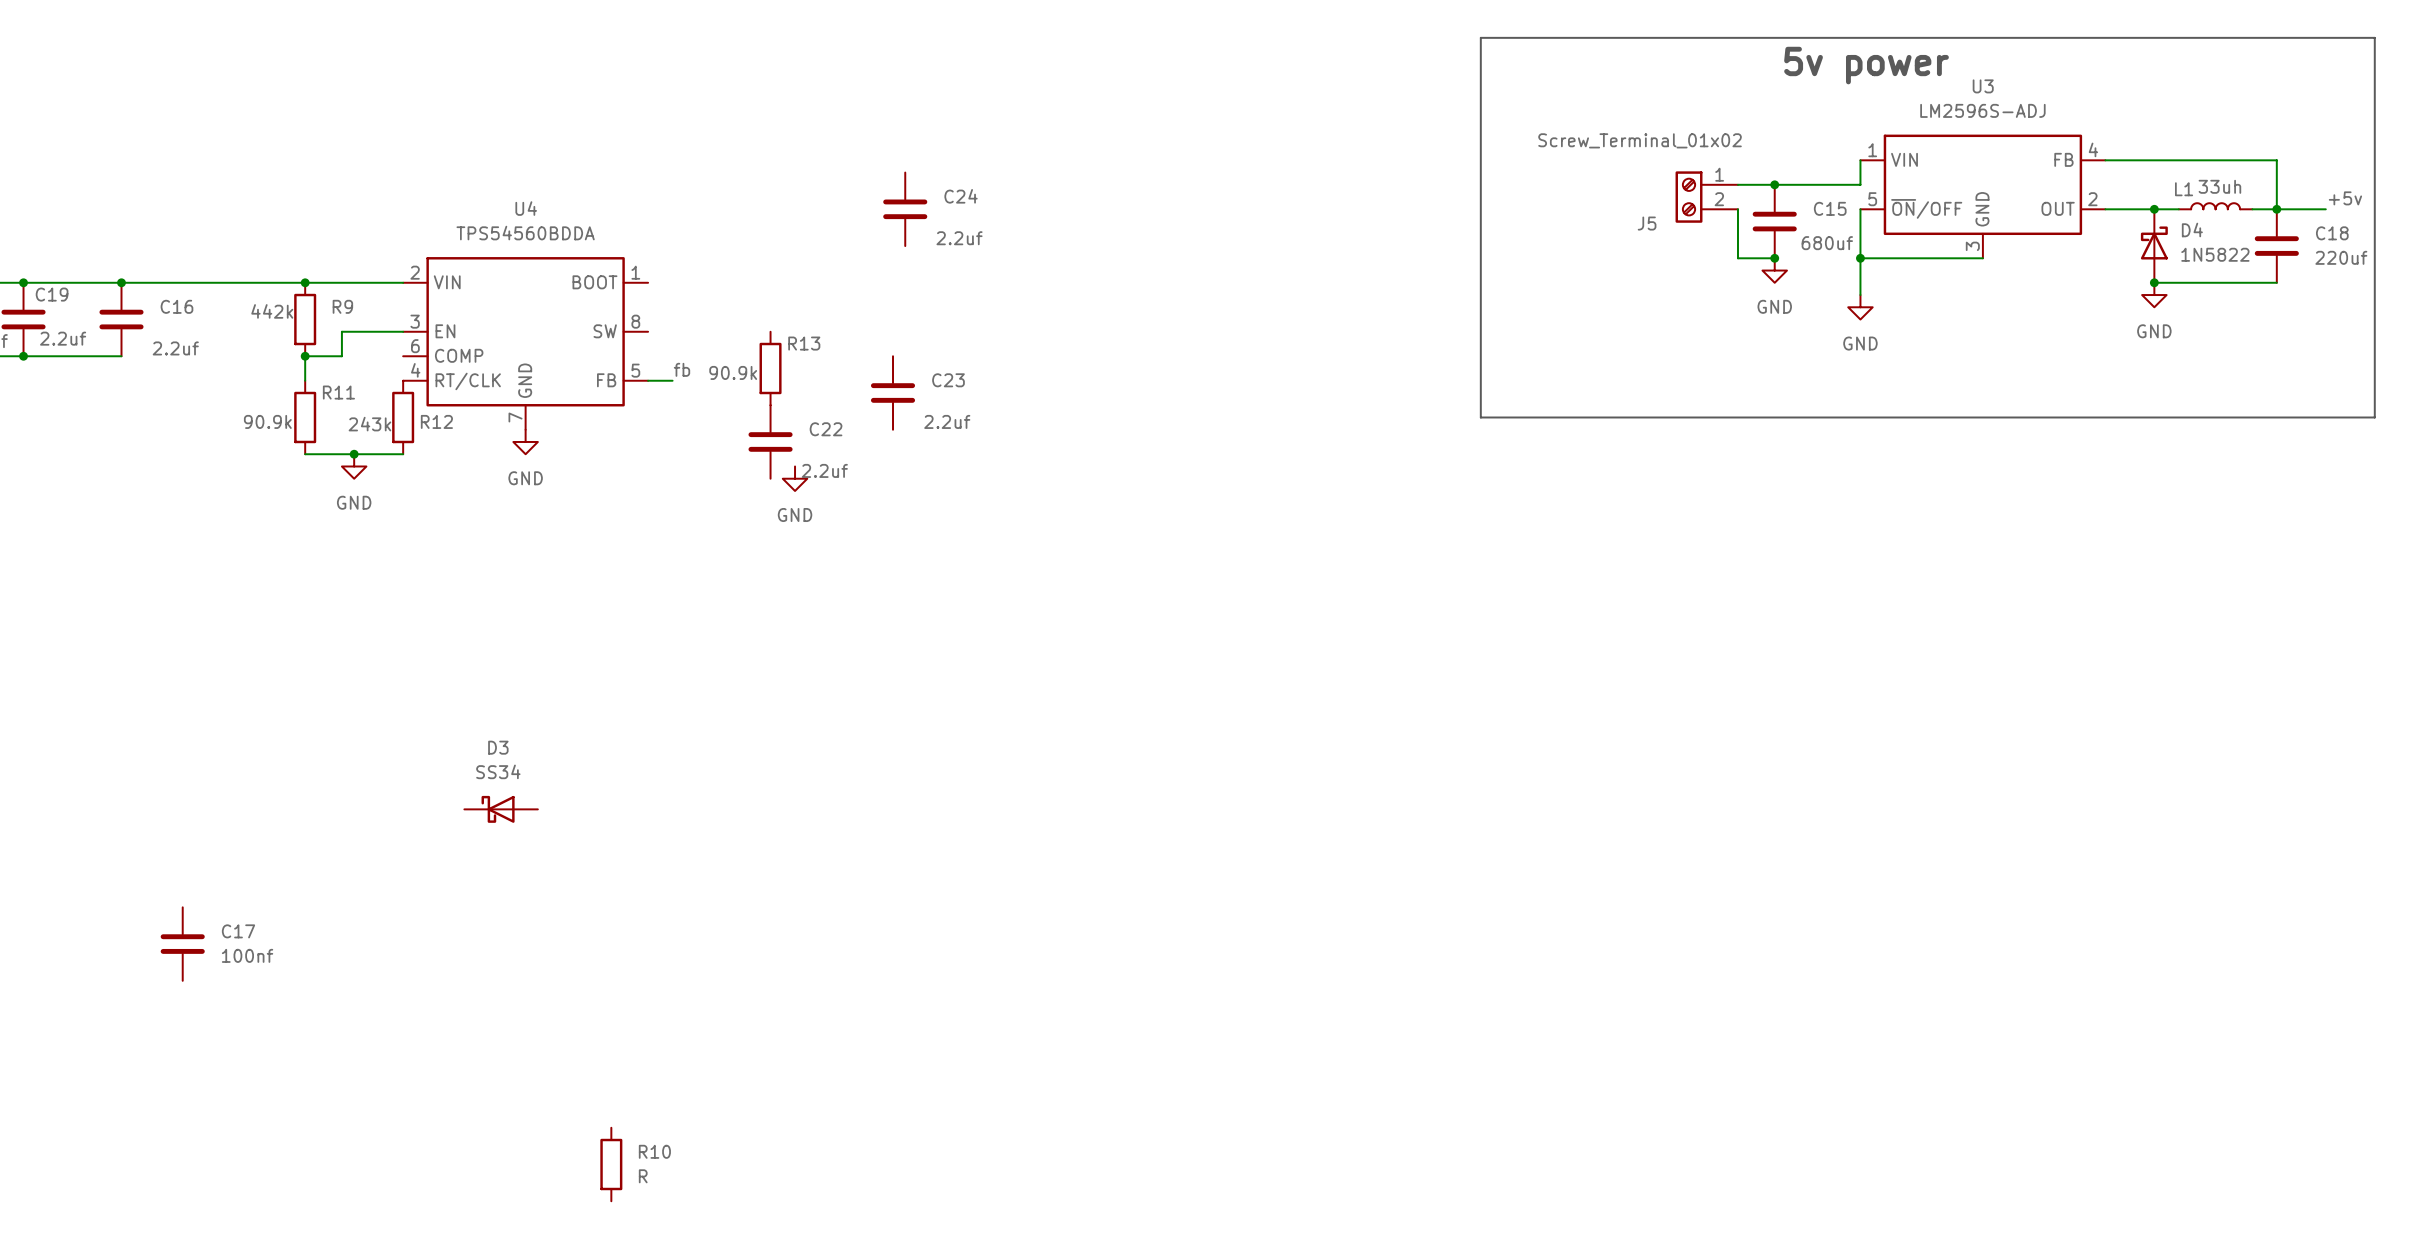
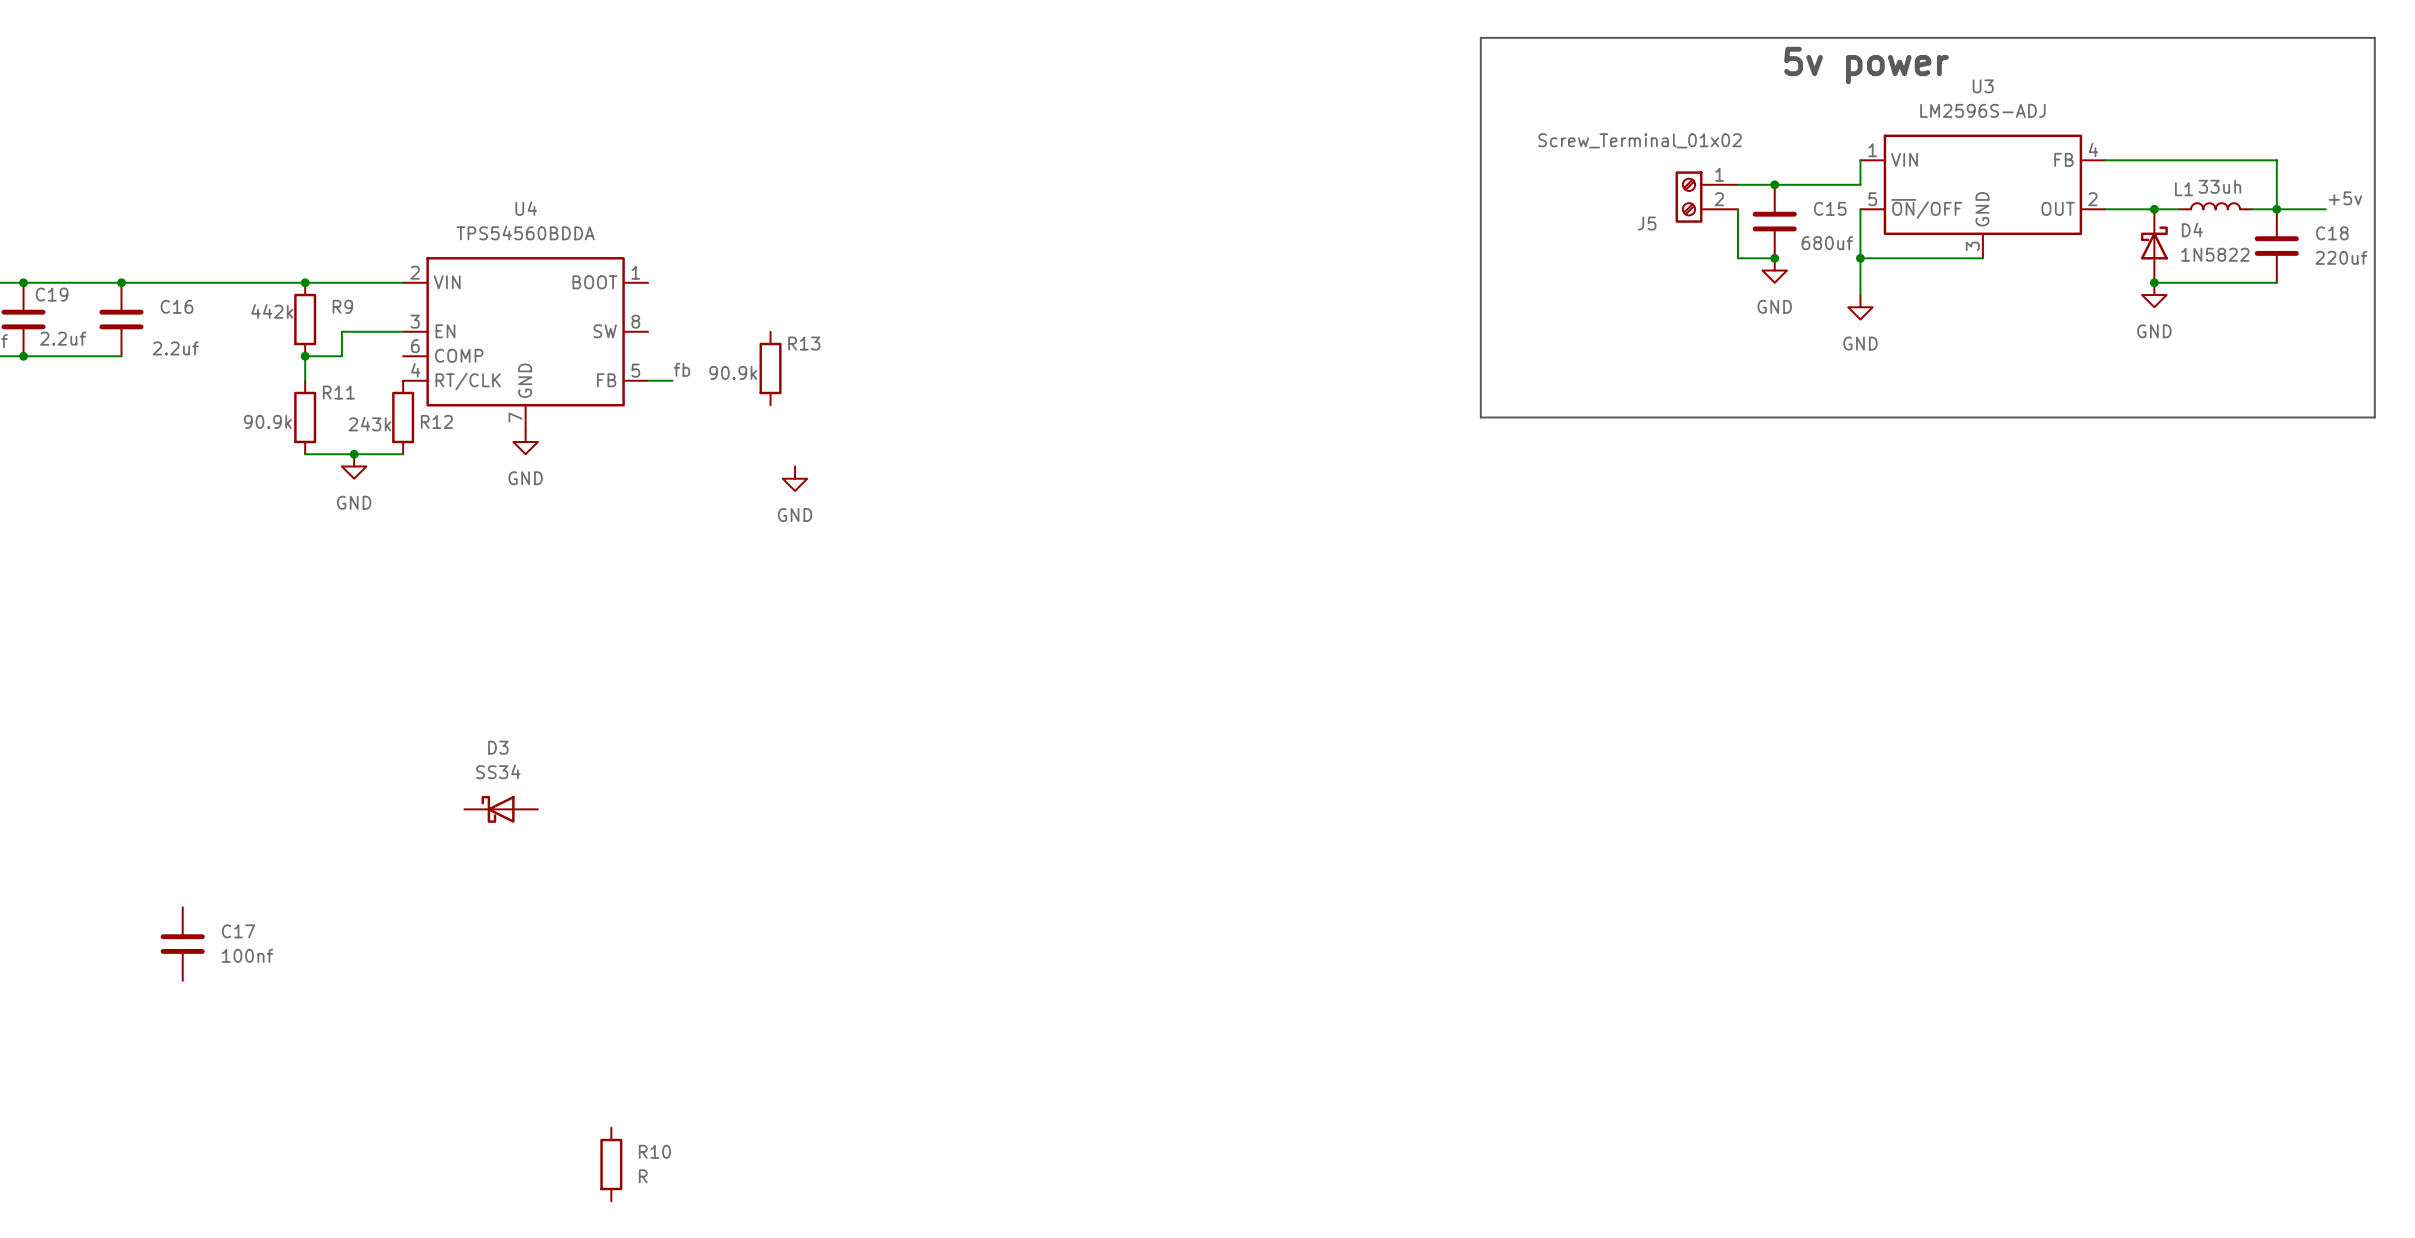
C24: 2.2uf (905, 209) -> none
C23: 2.2uf (893, 393) -> none
C22: 2.2uf (770, 441) -> none

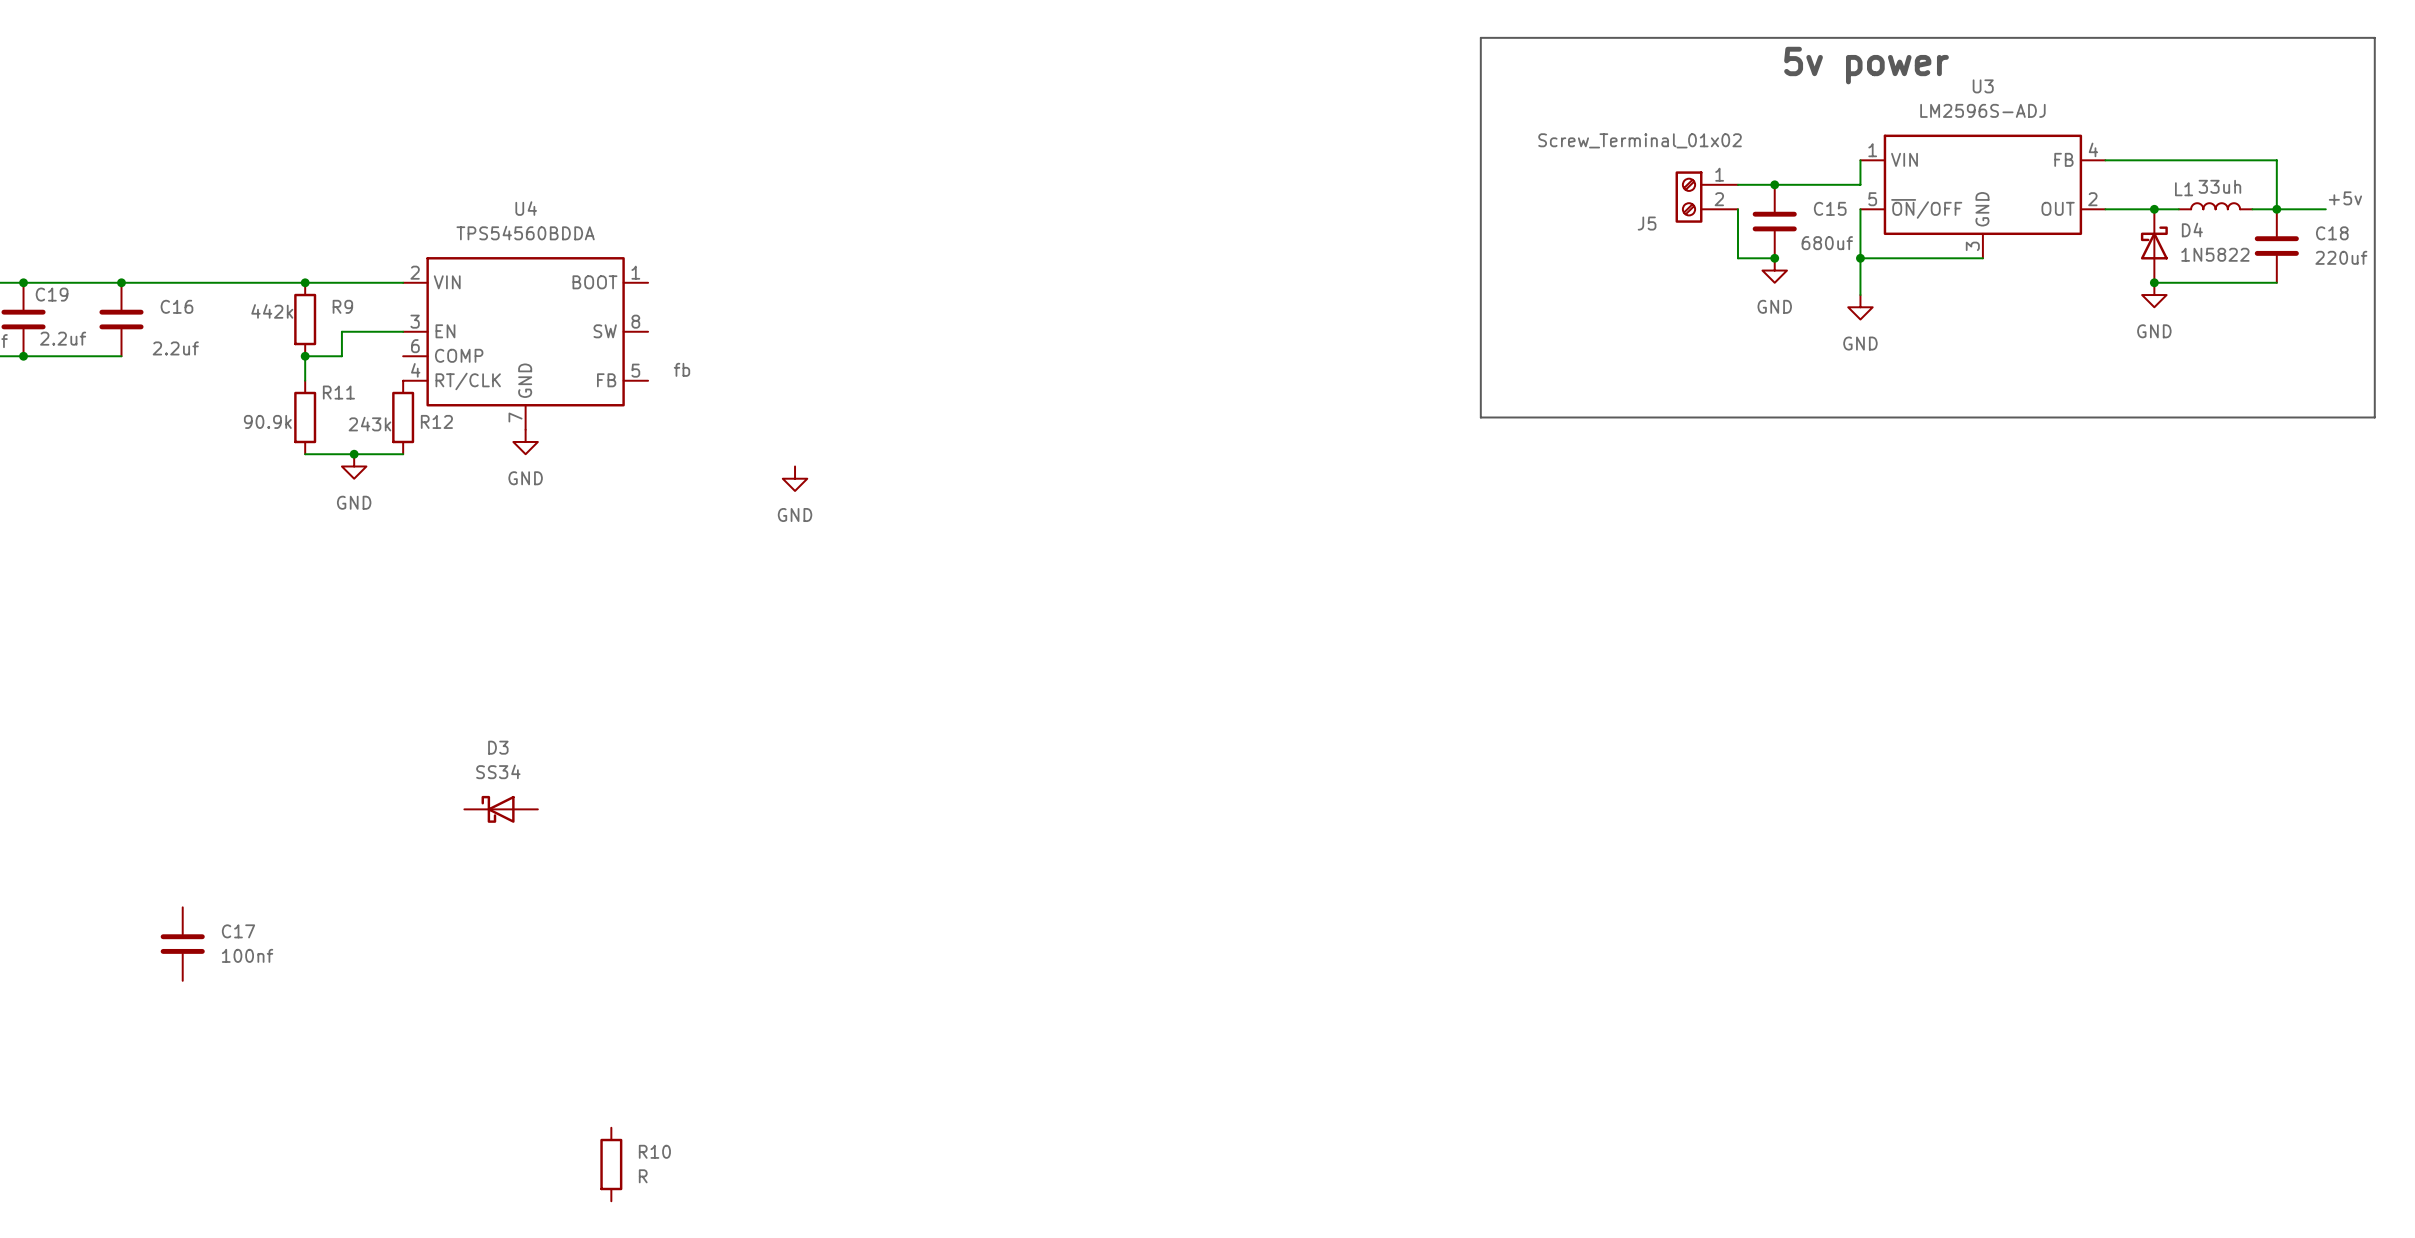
R13: 90.9k (770, 368) -> none
wire: (648, 380) (672, 380) -> none

